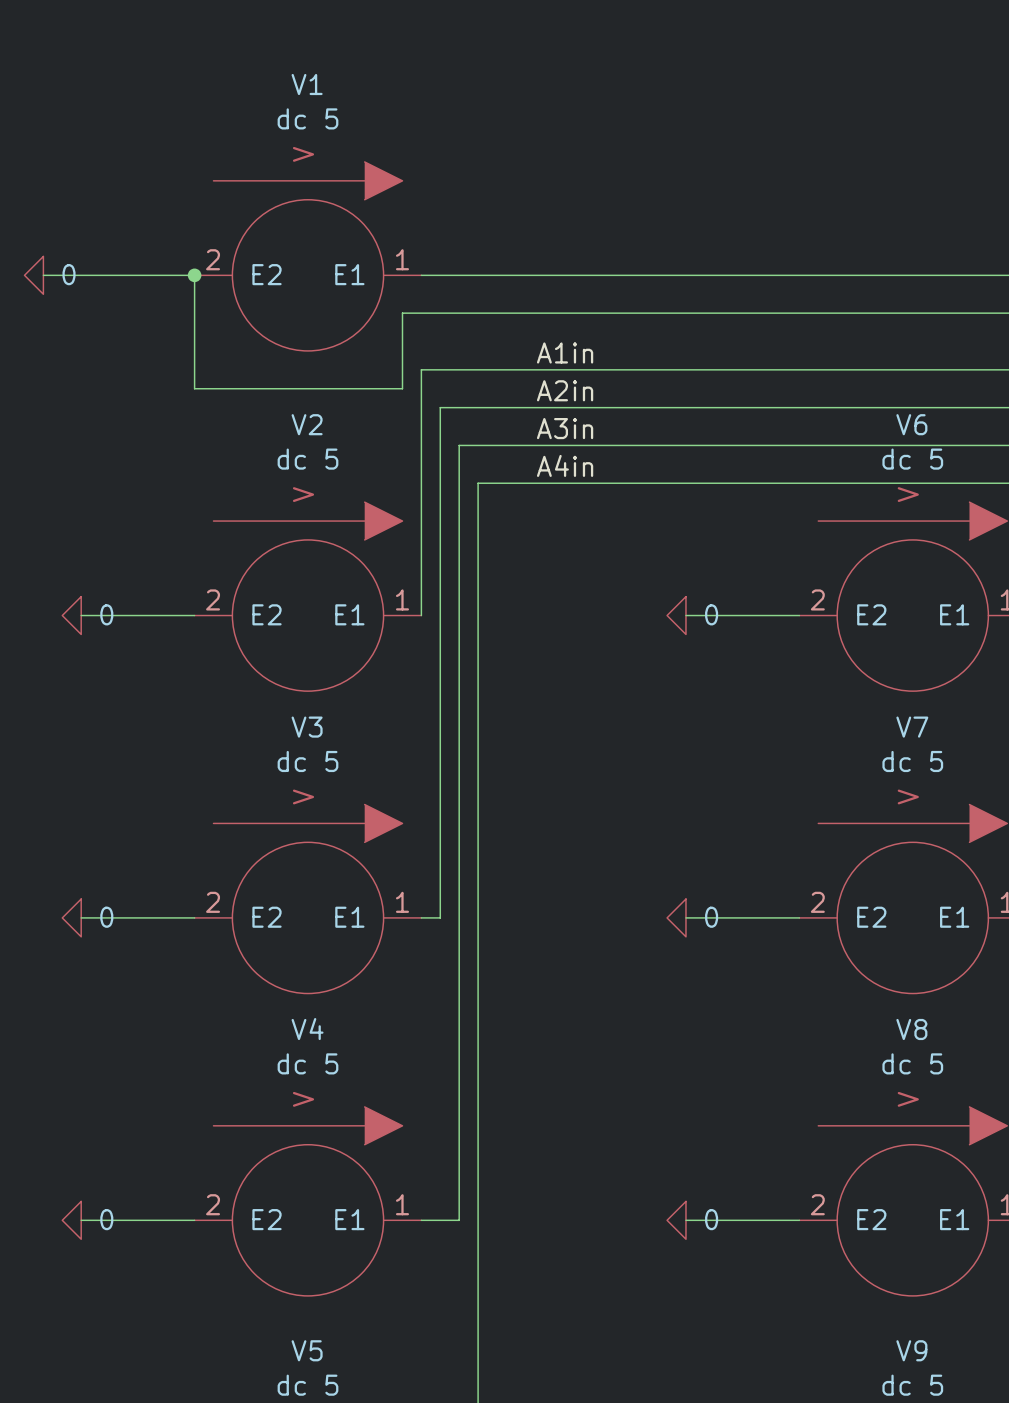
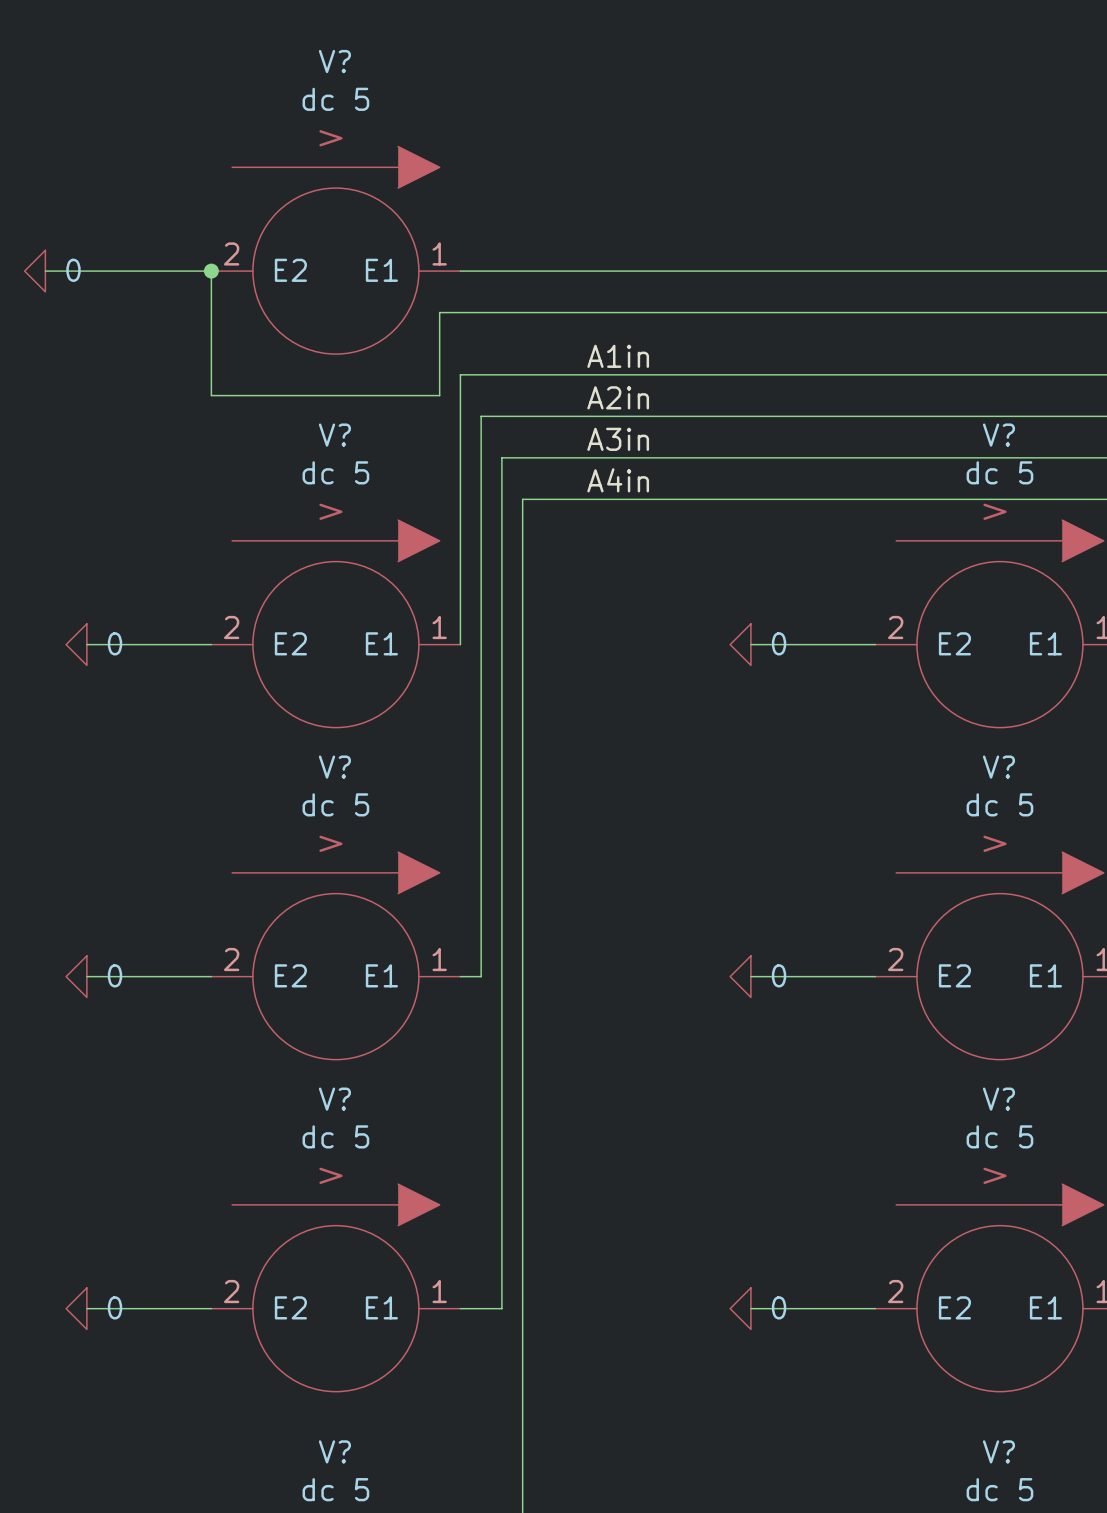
V1 name: V1 (307, 84) -> V? (334, 61)
V2 name: V2 (307, 424) -> V? (334, 435)
V6 name: V6 (911, 424) -> V? (998, 435)
V3 name: V3 (307, 727) -> V? (334, 767)
V7 name: V7 (912, 727) -> V? (998, 767)
V4 name: V4 (307, 1029) -> V? (334, 1099)
V8 name: V8 (911, 1029) -> V? (998, 1099)
V5 name: V5 (307, 1350) -> V? (334, 1451)
V9 name: V9 (911, 1350) -> V? (998, 1451)

